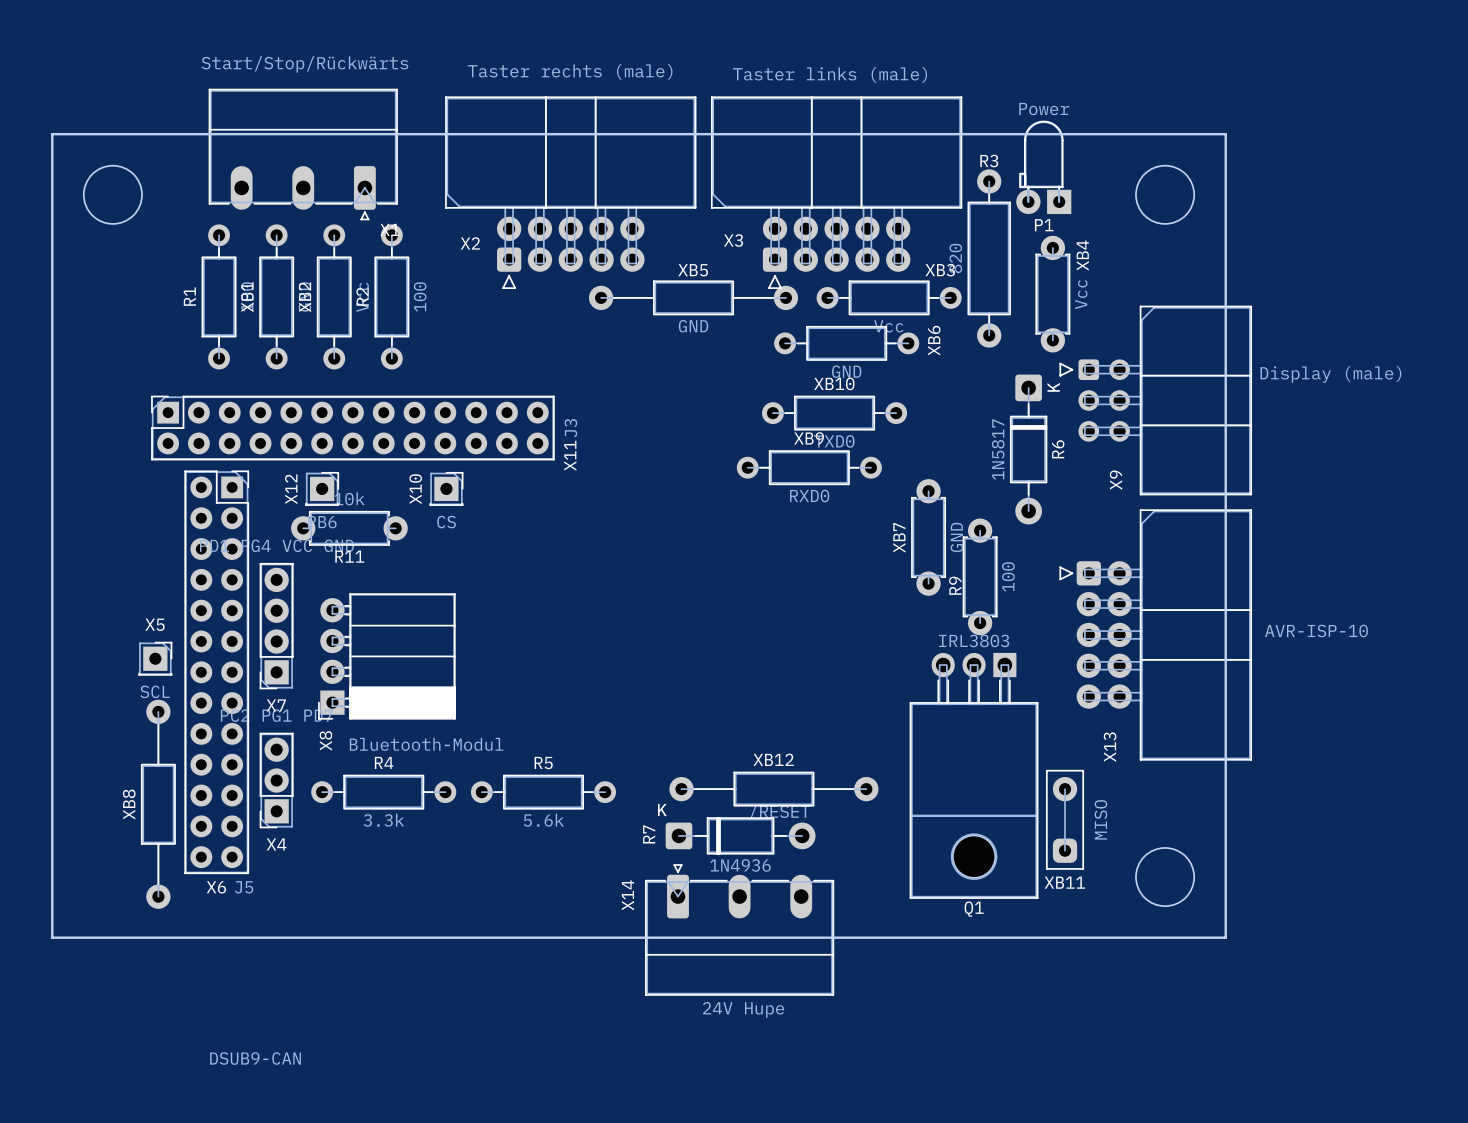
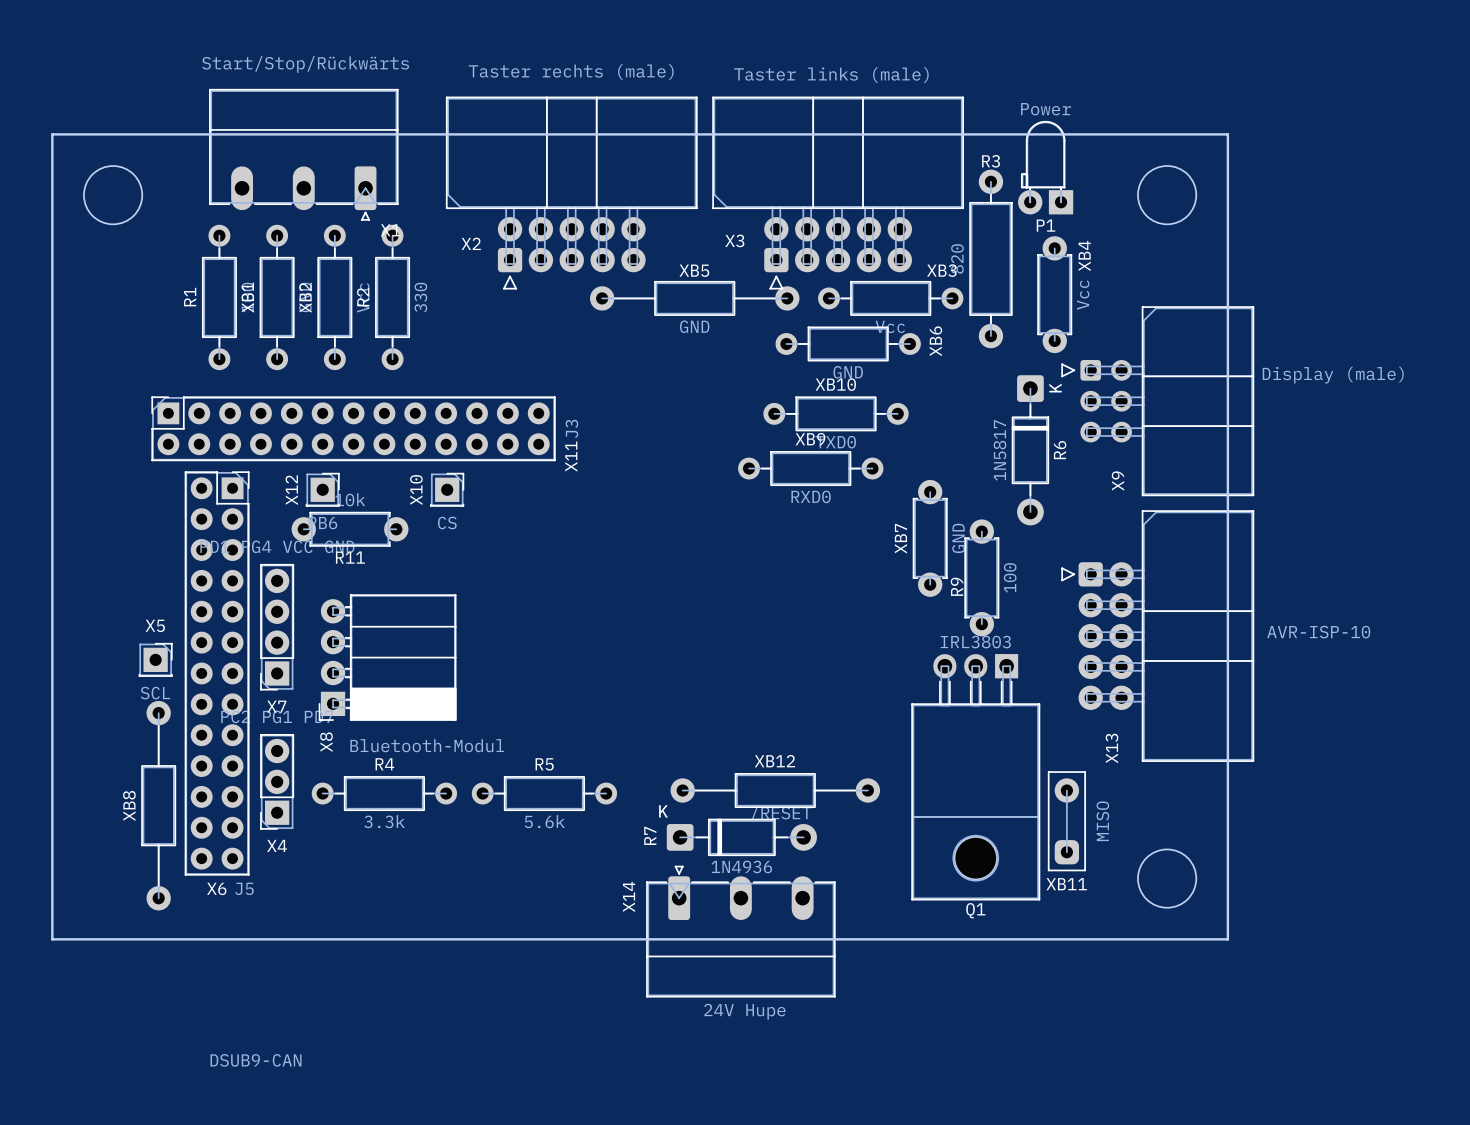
R2 value: 100 (420, 296) -> 330 (420, 297)

